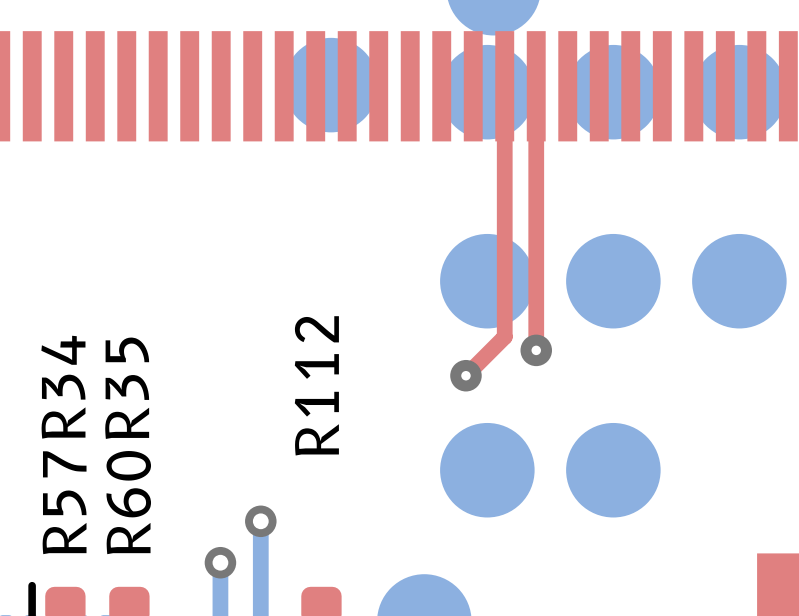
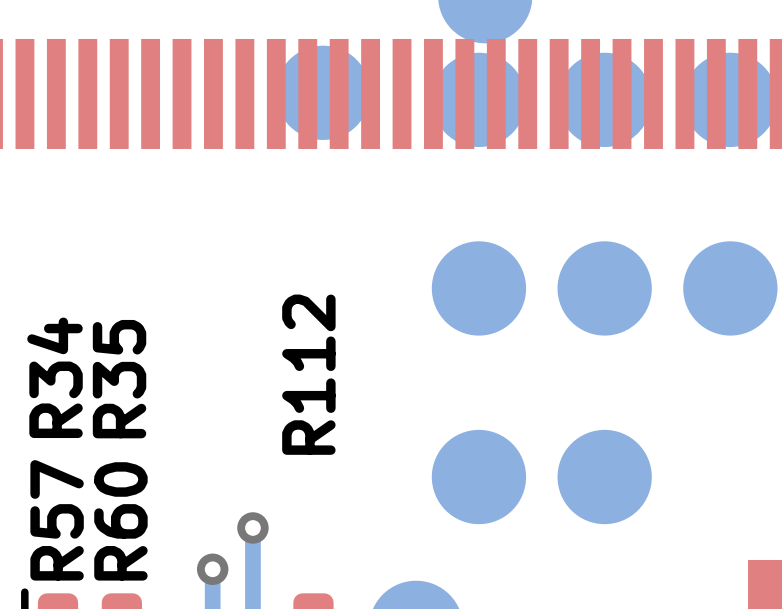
top track: (504, 86) (504, 336) (465, 375) -> none
top track: (536, 86) (536, 350) -> none
via: (536, 350) -> none
via: (465, 375) -> none

